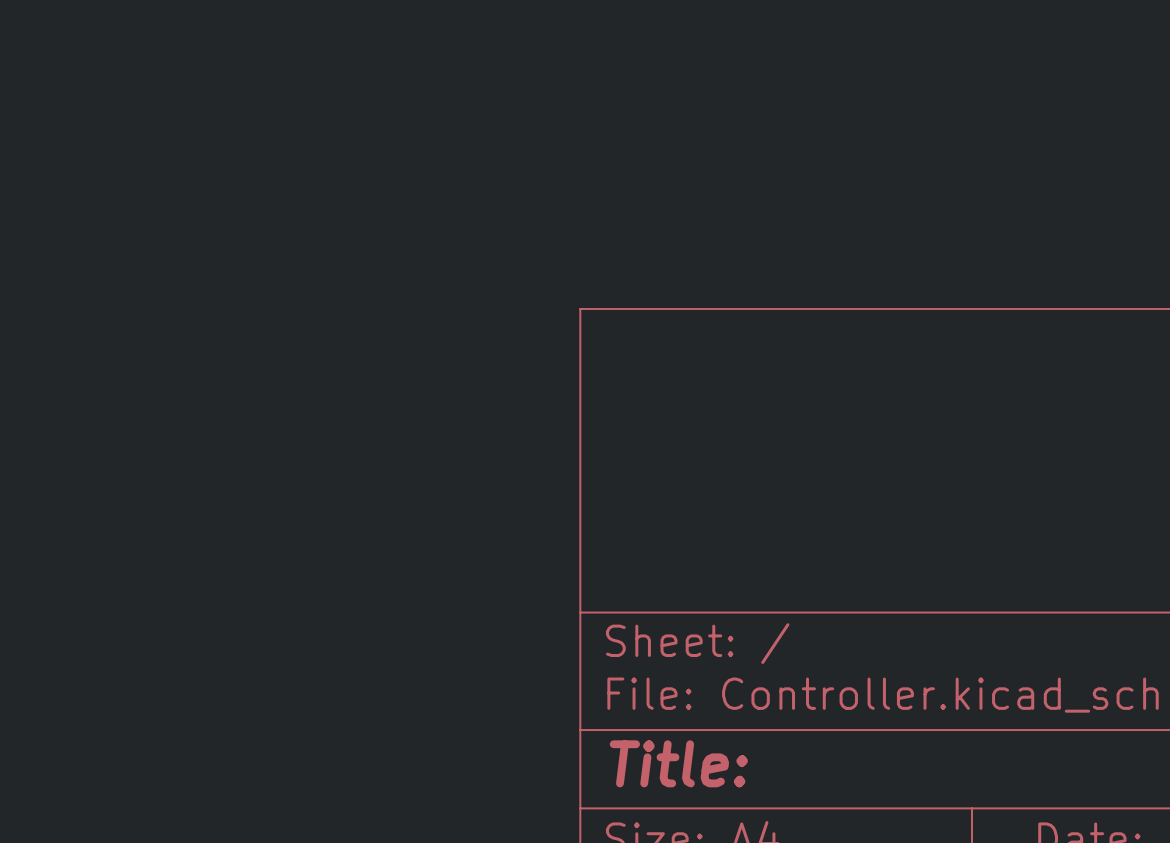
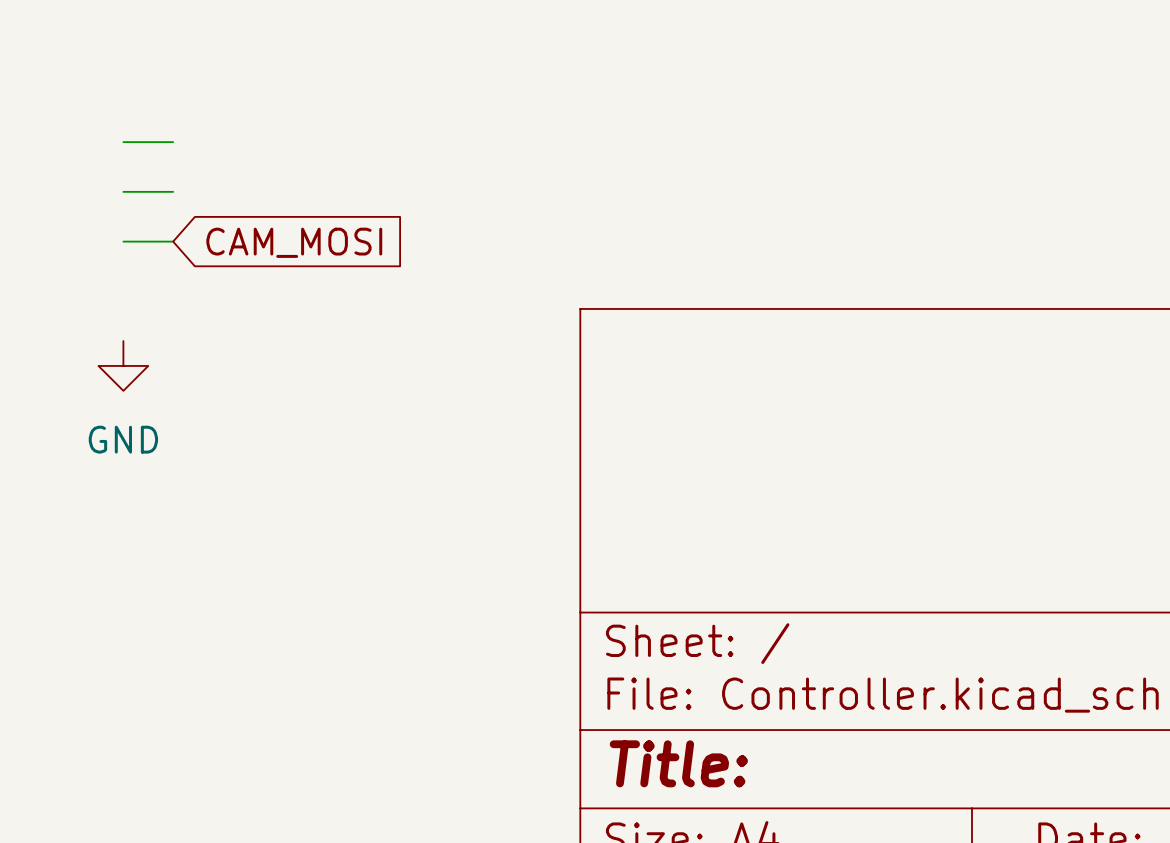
wire: none -> (123, 142) (173, 142)
wire: none -> (123, 191) (173, 191)
wire: none -> (123, 241) (173, 241)
global label: none -> CAM_MOSI (294, 242)
power symbol: none -> GND (123, 365)

